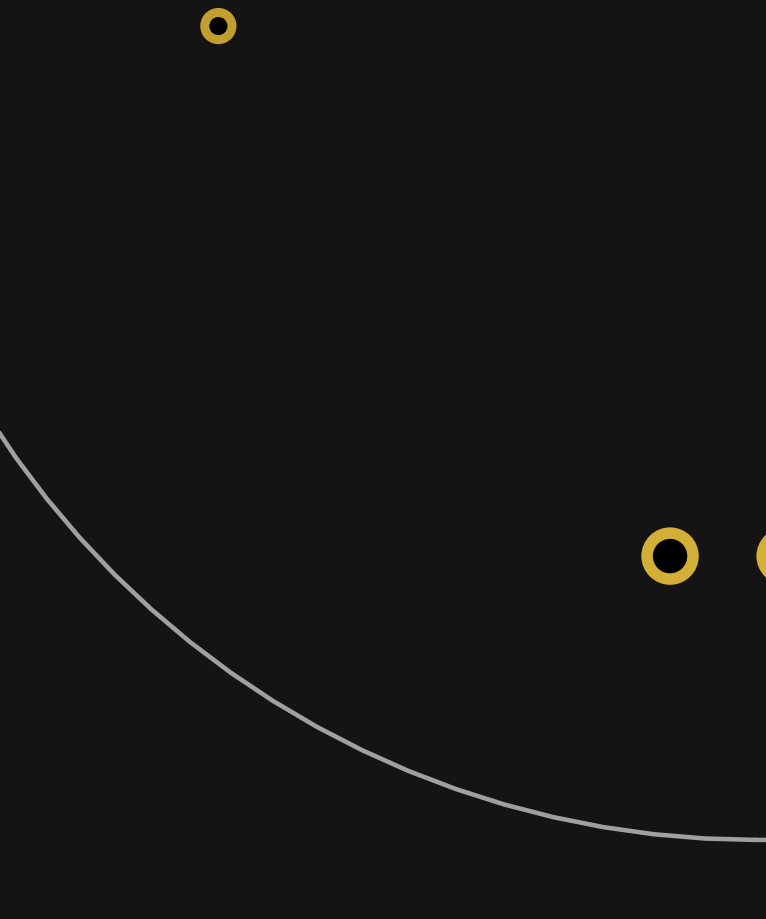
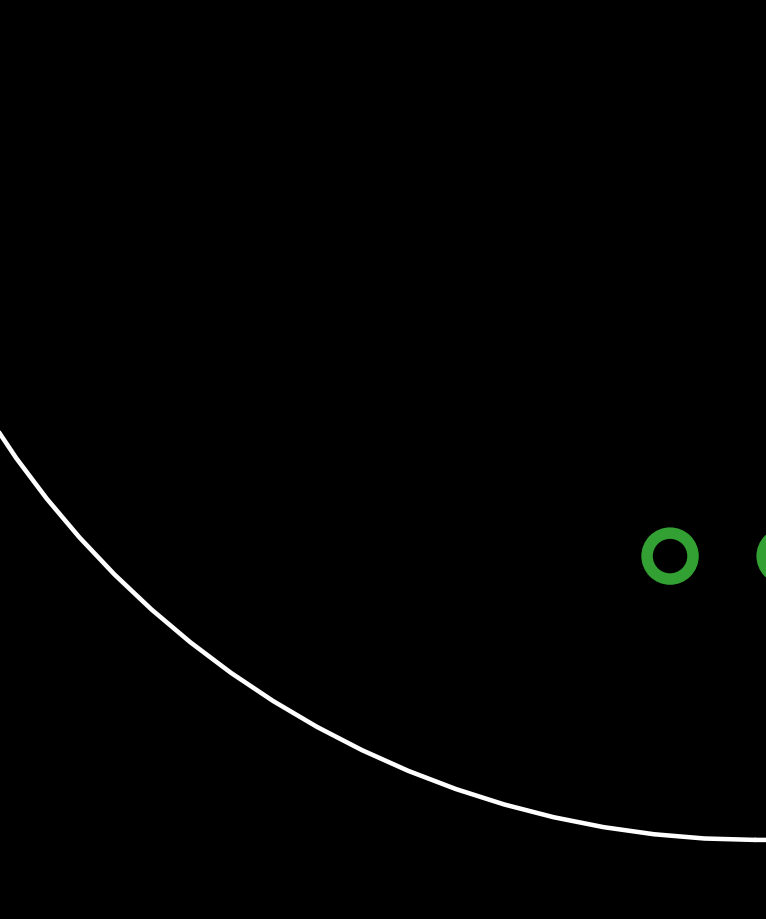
via: (218, 26) -> none

